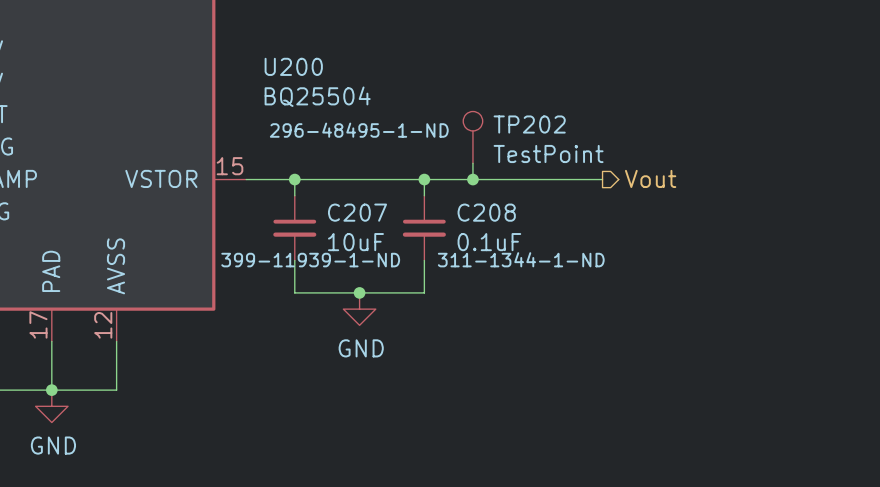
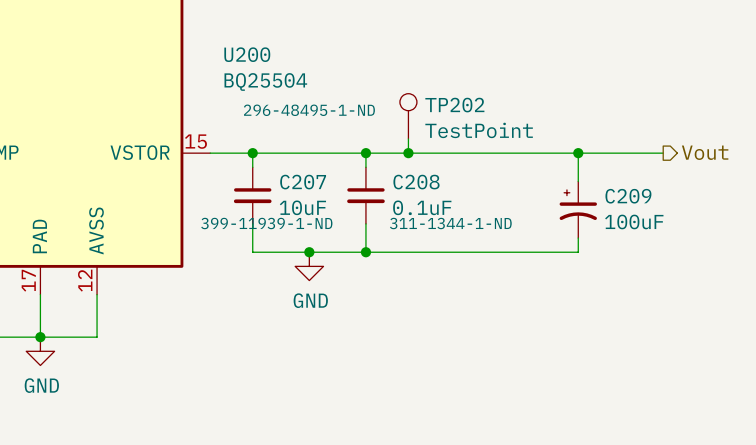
hierarchical label position: Vout (650, 178) -> Vout (705, 152)
wire: none -> (521, 153) (663, 153)
wire: none -> (578, 153) (578, 181)
junction: none -> (578, 153)
C209: none -> 100uF (578, 209)
wire: none -> (578, 238) (578, 252) (365, 252)
junction: none -> (365, 252)

